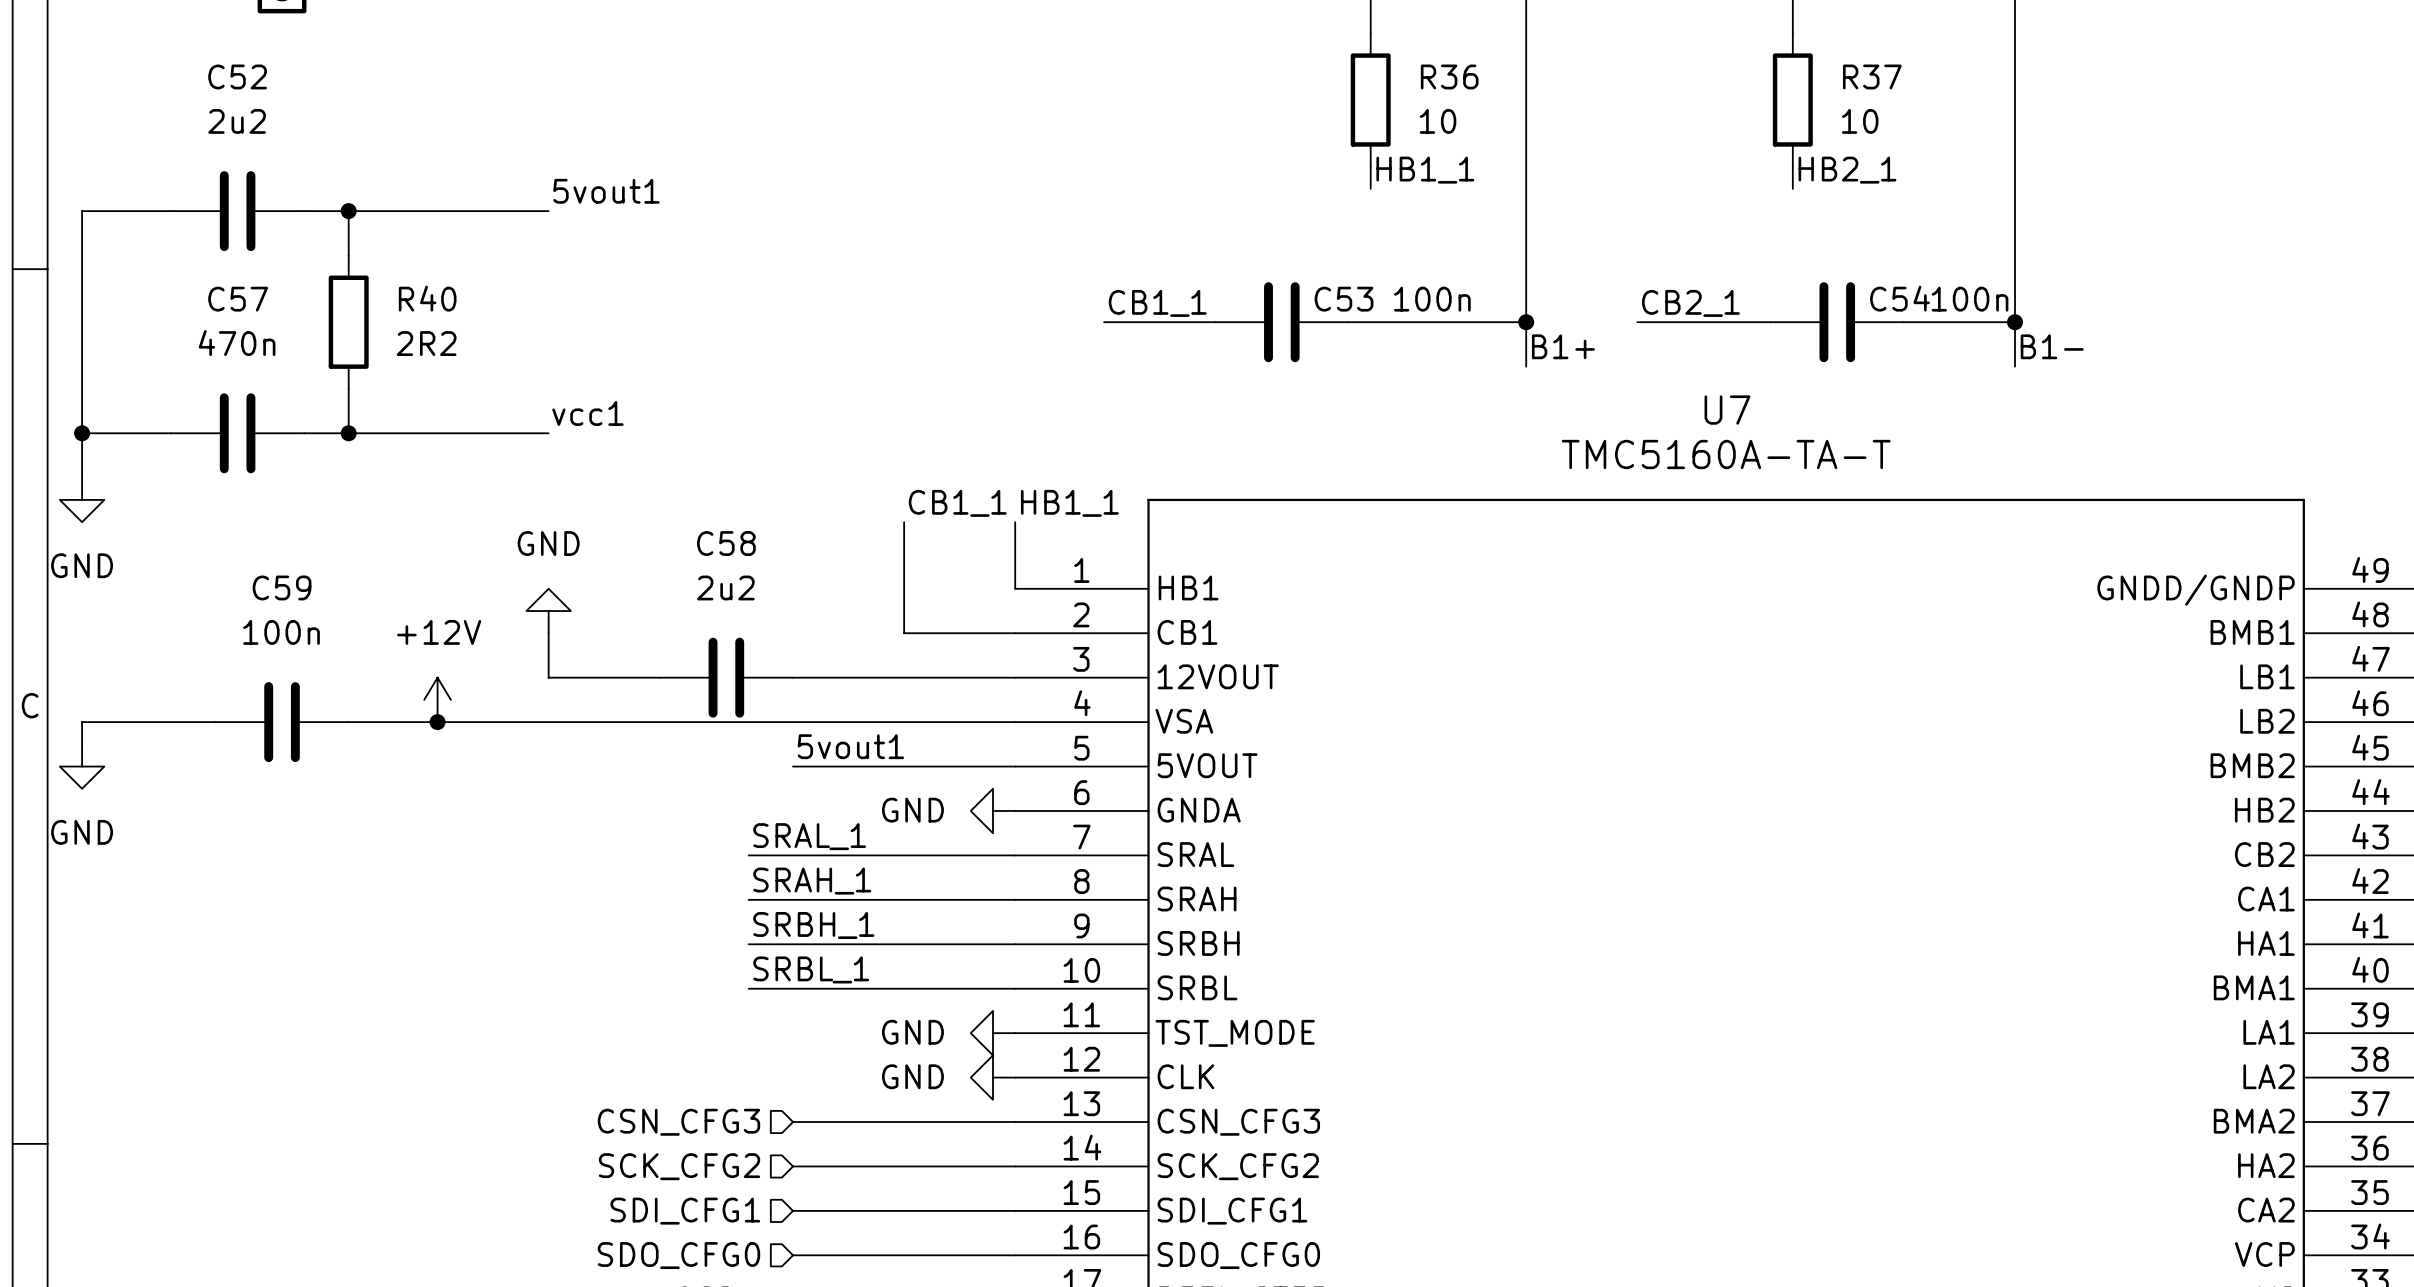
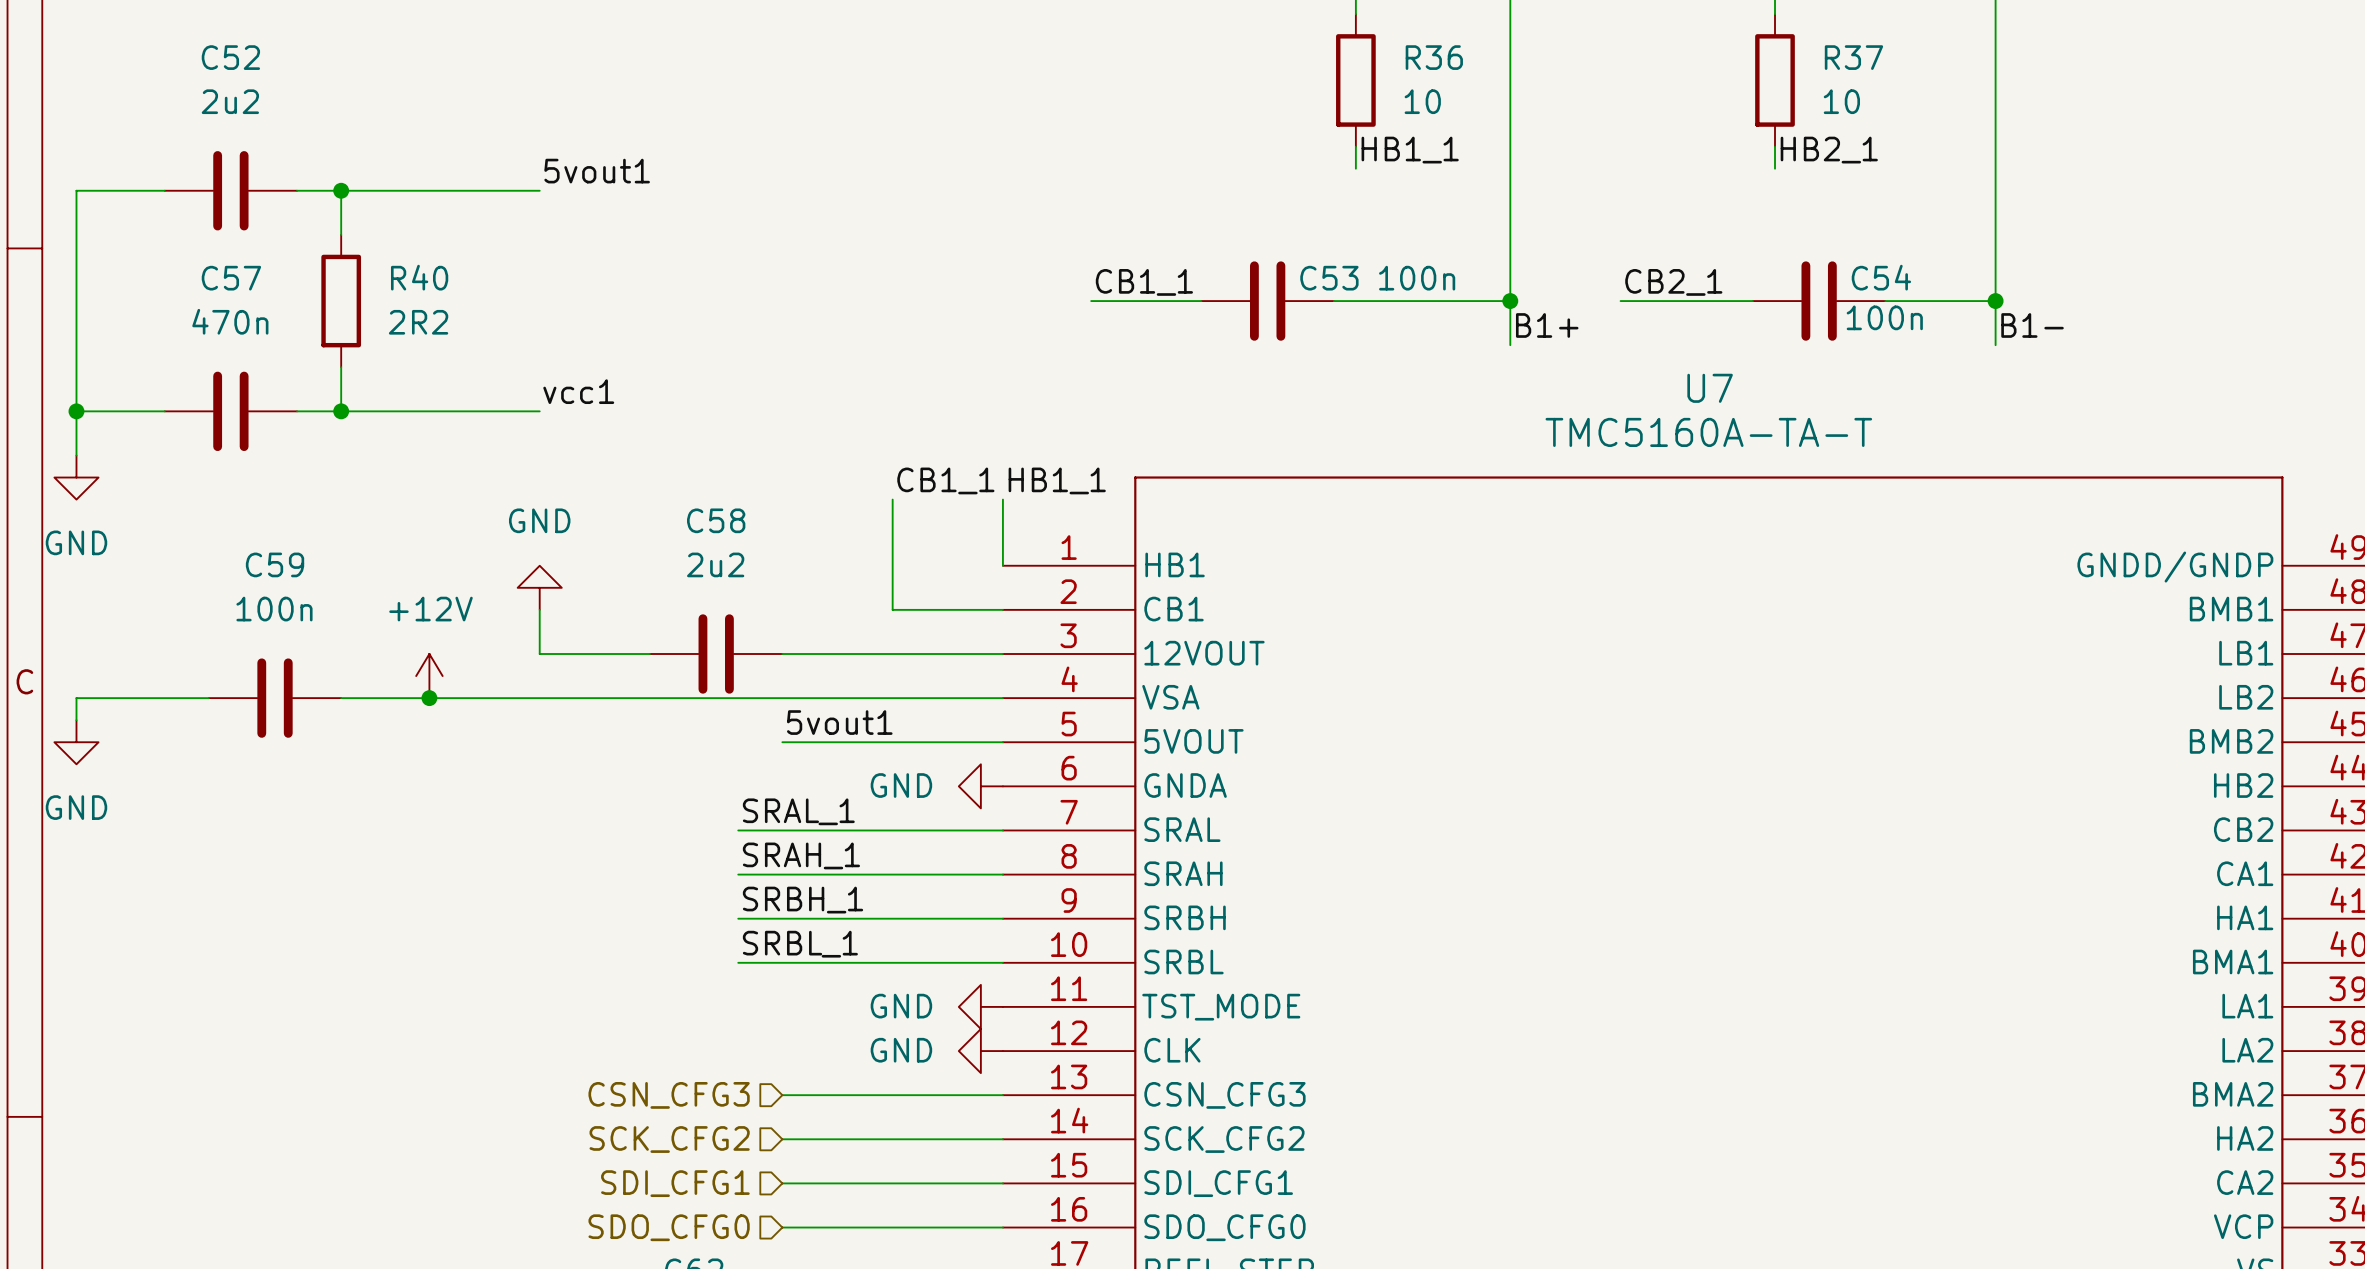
C54 value position: 100n (1970, 299) -> 100n (1884, 317)

